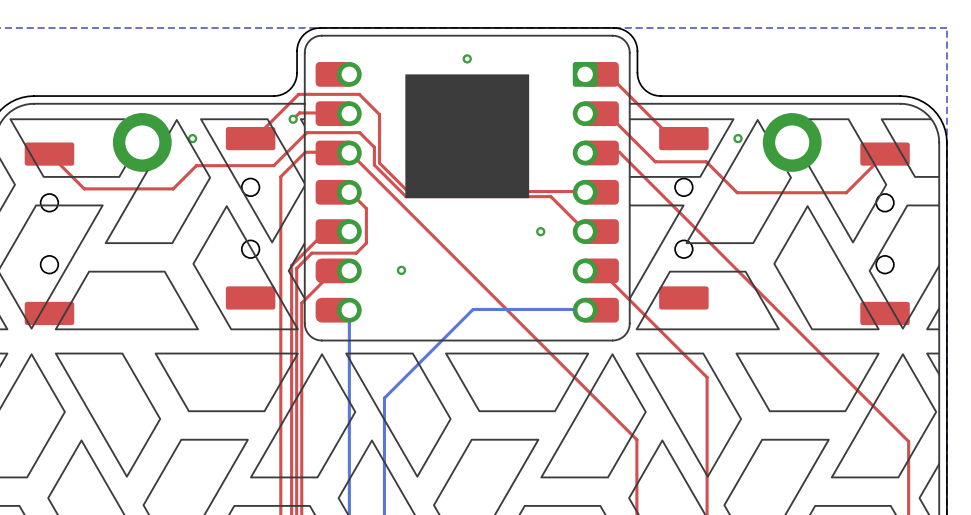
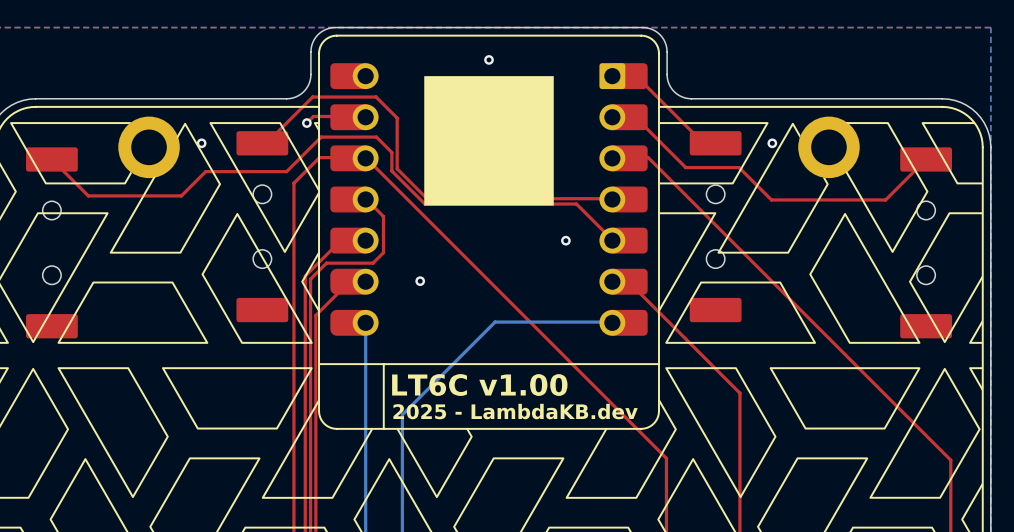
line: (629, 323) (624, 335) (612, 340) (321, 340) (309, 335) (304, 323) -> (658, 336) (658, 413) (652, 425) (641, 428) (332, 428) (322, 421) (319, 413) (319, 336)
line: none -> (383, 364) (383, 428)
line: none -> (658, 364) (319, 364)
drawing: [345, 352, 590, 478] -> none
drawing shape: [250, 353, 357, 479] -> [261, 398, 373, 499]
drawing shape: [540, 353, 647, 479] -> [565, 398, 677, 499]
text: none -> LT6C v1.00 (479, 385)
text: none -> 2025 - LambdaKB.dev (515, 411)
drawing: none -> [396, 428, 473, 499]

